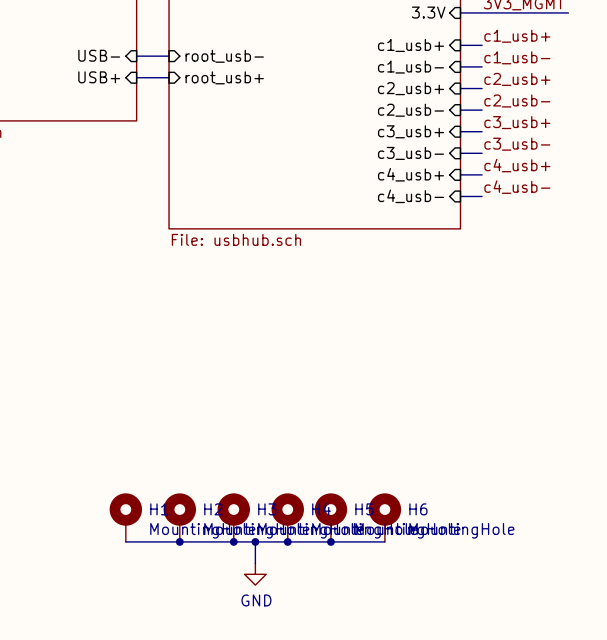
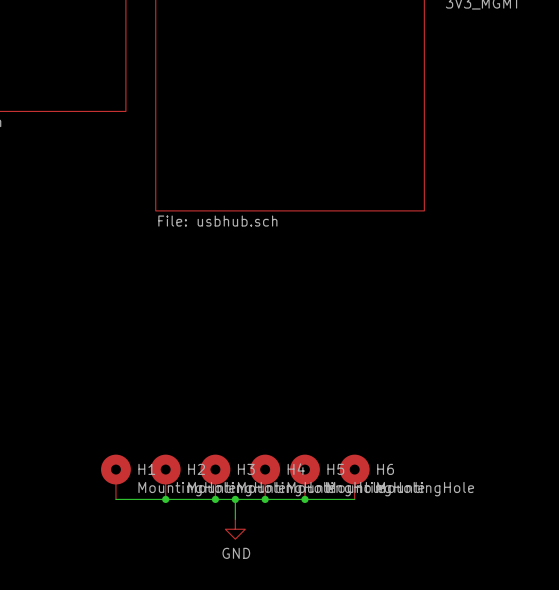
sheet pin: 3.3V (428, 12) -> none
wire: (460, 12) (568, 12) -> none
label: c1_usb+ (517, 36) -> none
sheet pin: c1_usb+ (410, 45) -> none
wire: (460, 45) (482, 45) -> none
sheet pin: USB- (99, 55) -> none
wire: (136, 56) (169, 56) -> none
sheet pin: root_usb- (224, 56) -> none
label: c1_usb- (517, 57) -> none
wire: (460, 66) (482, 66) -> none
sheet pin: c1_usb- (410, 67) -> none
sheet pin: USB+ (99, 77) -> none
wire: (136, 77) (169, 77) -> none
sheet pin: root_usb+ (224, 77) -> none
label: c2_usb+ (517, 79) -> none
sheet pin: c2_usb+ (410, 88) -> none
wire: (460, 88) (482, 88) -> none
label: c2_usb- (517, 101) -> none
sheet pin: c2_usb- (410, 110) -> none
wire: (460, 110) (482, 110) -> none
label: c3_usb+ (517, 122) -> none
sheet pin: c3_usb+ (410, 131) -> none
wire: (460, 131) (482, 131) -> none
label: c3_usb- (517, 144) -> none
sheet pin: c3_usb- (410, 153) -> none
wire: (460, 153) (482, 153) -> none
label: c4_usb+ (517, 165) -> none
sheet pin: c4_usb+ (410, 174) -> none
wire: (460, 174) (482, 174) -> none
label: c4_usb- (517, 187) -> none
sheet pin: c4_usb- (410, 196) -> none
wire: (460, 196) (482, 196) -> none

